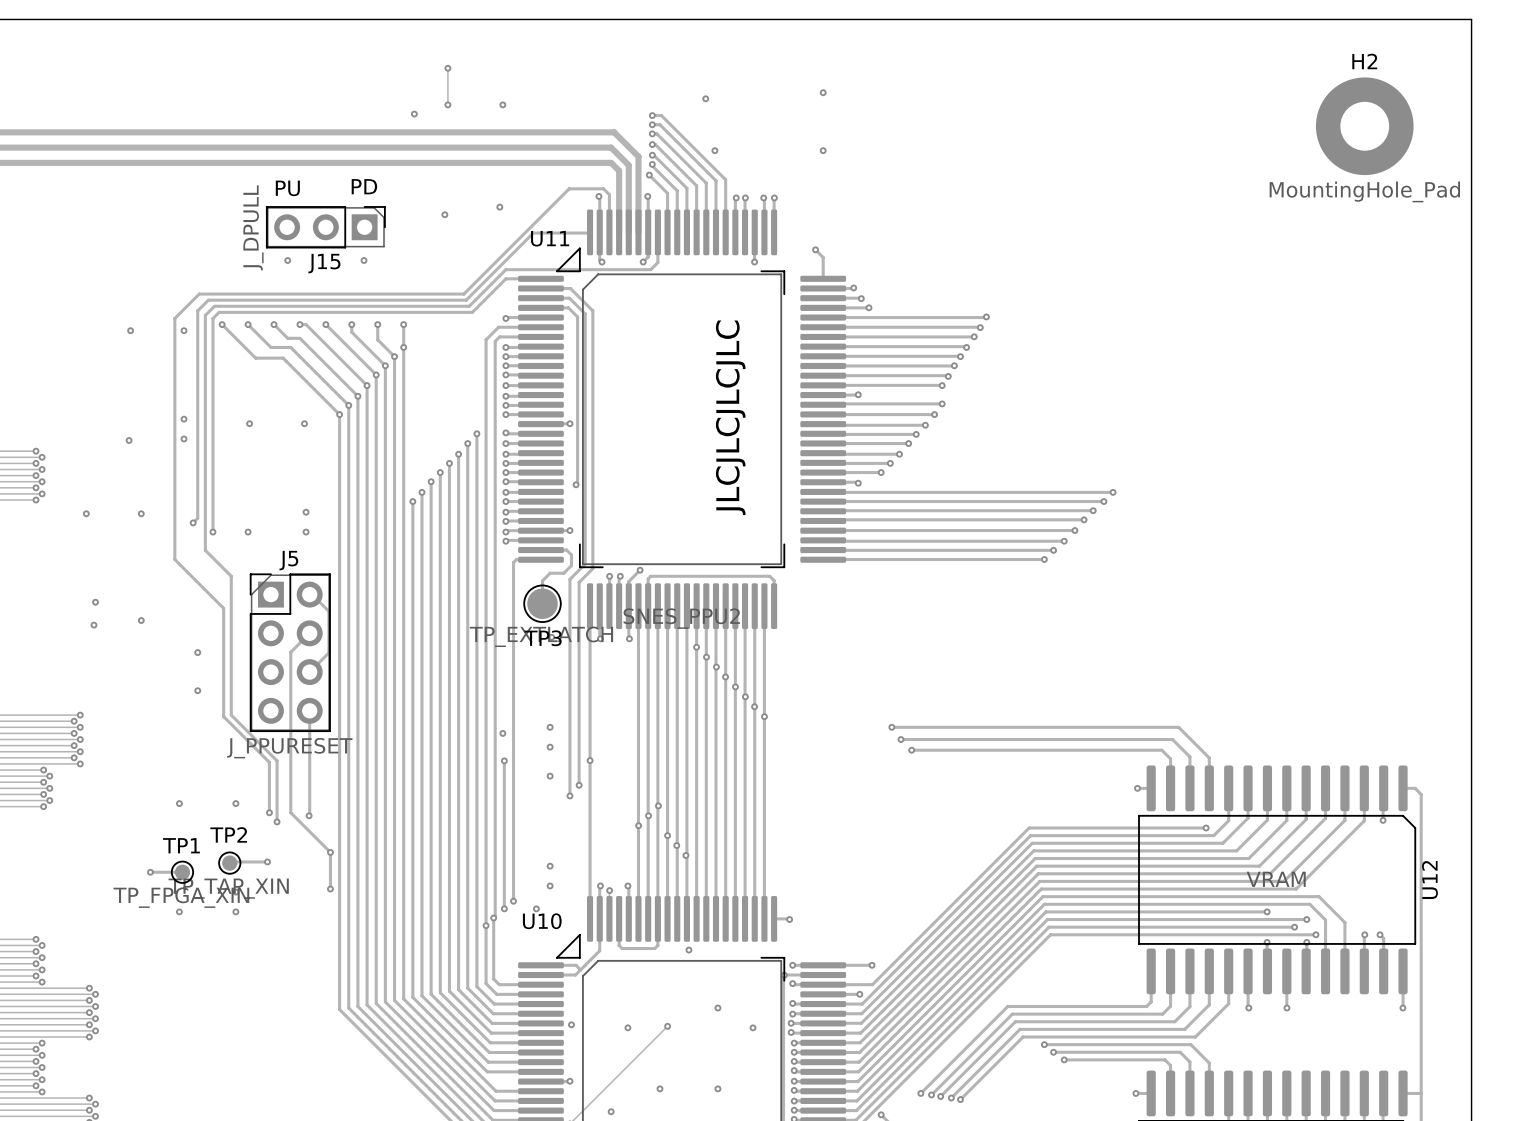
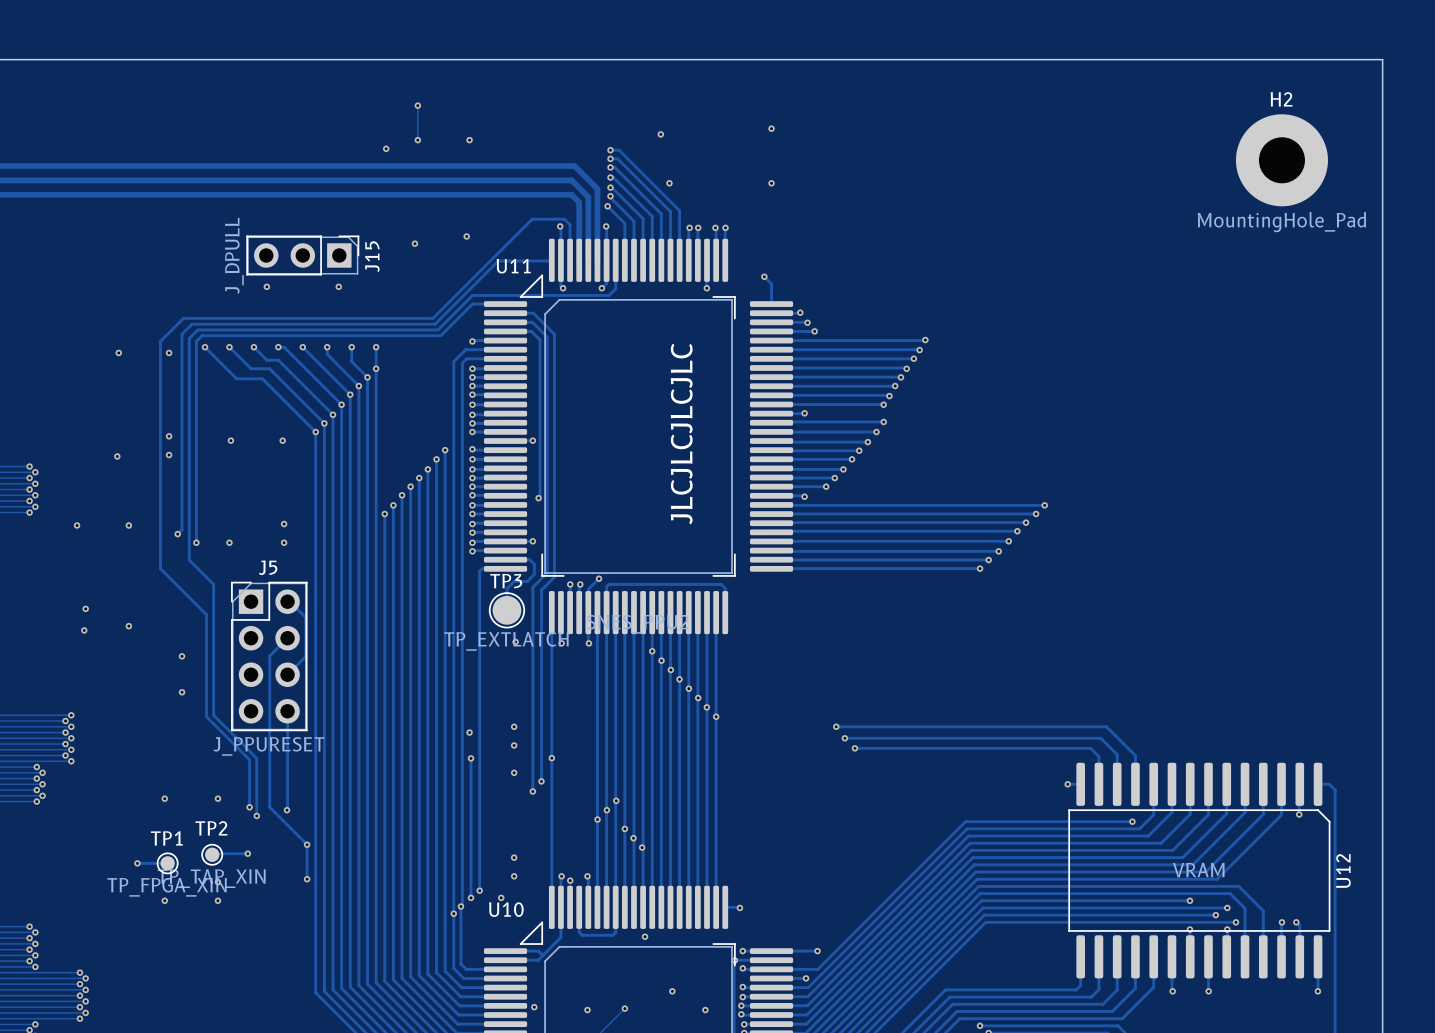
text: PD (364, 186) -> none
text: PU (287, 188) -> none
J15 name rotation: 0° (324, 263) -> 90° counterclockwise (372, 256)
J15 name position: J15 (324, 263) -> J15 (372, 256)
TP3 name position: TP3 (543, 638) -> TP3 (506, 581)

